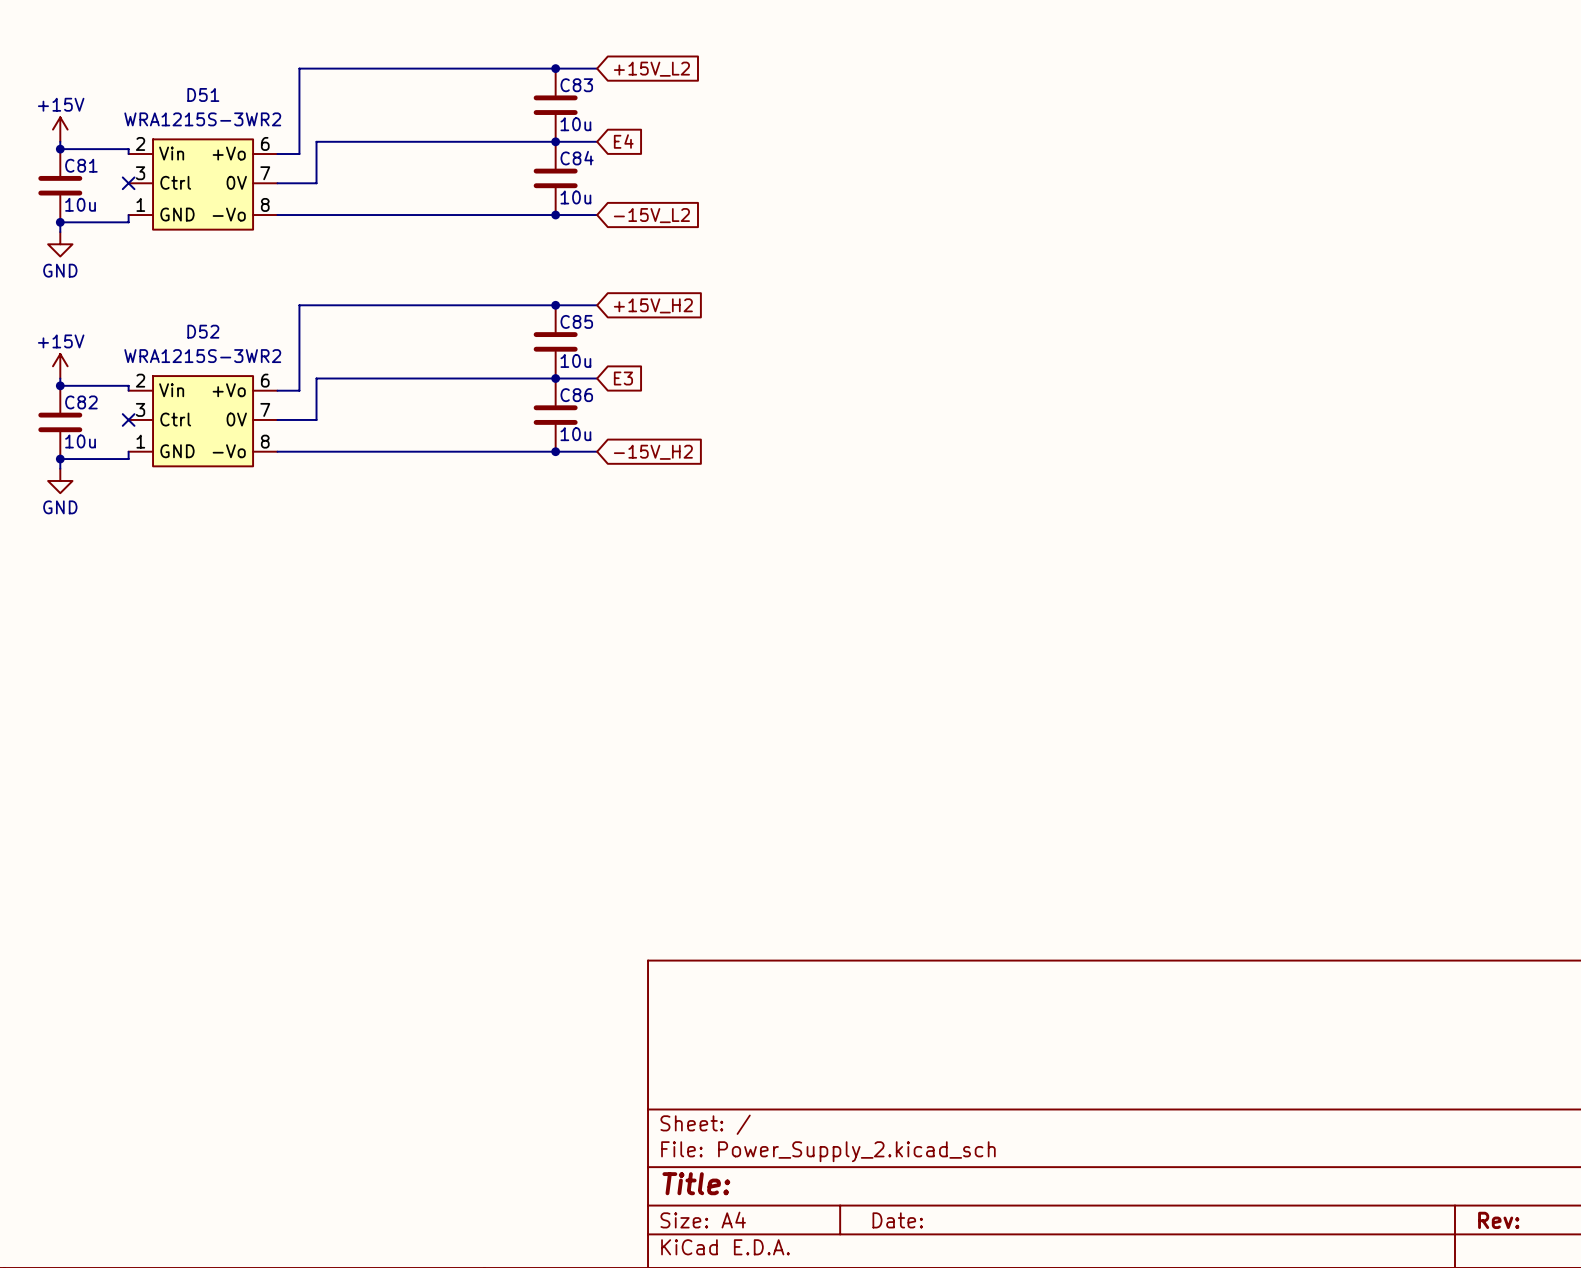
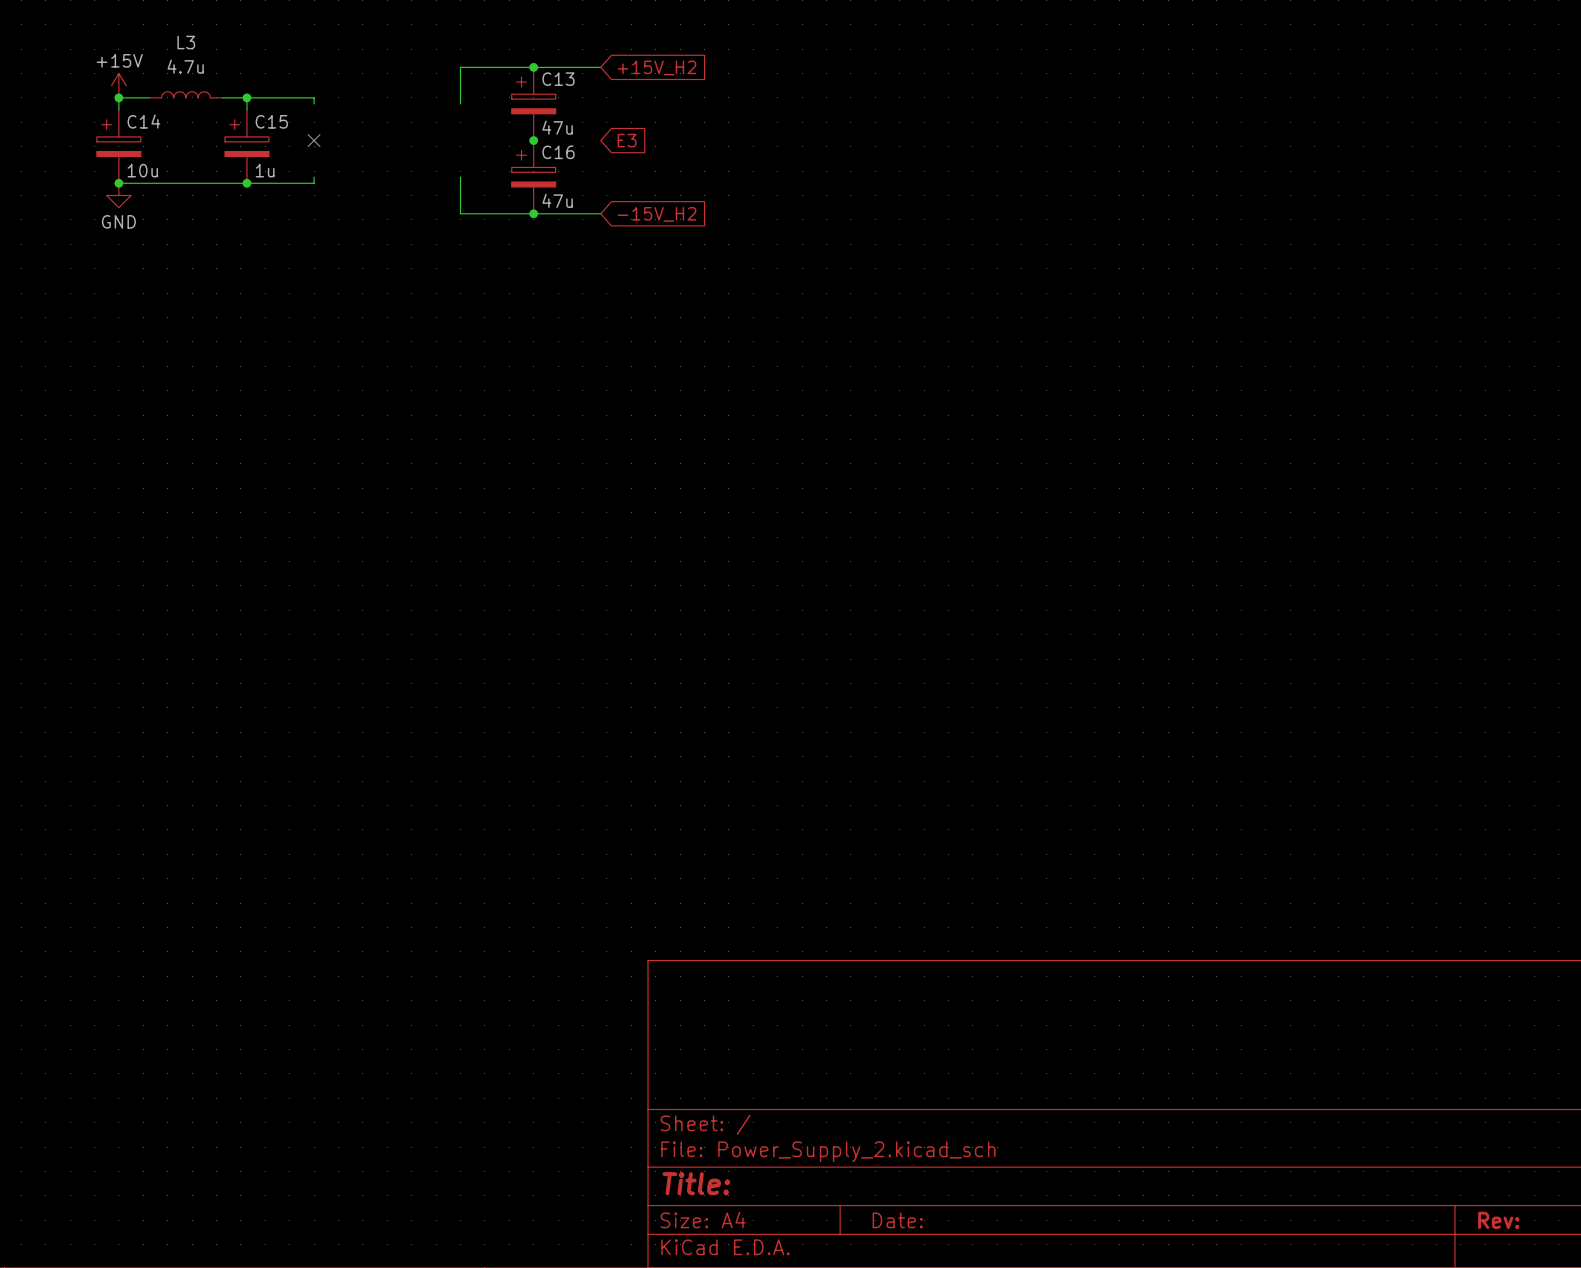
wire: none -> (600, 67) (460, 67) (460, 103)
junction position: (555, 68) -> (533, 67)
wire: (597, 68) (299, 68) (299, 154) (277, 154) -> none
global label: +15V_L2 (651, 69) -> none
L3: none -> 4.7u (185, 94)
junction: none -> (118, 97)
wire: none -> (149, 97) (118, 97) (118, 110)
wire: none -> (222, 97) (314, 97) (314, 103)
wire: none -> (246, 97) (246, 110)
junction: none -> (246, 97)
C13: none -> 47u (533, 103)
C83: 10u (555, 105) -> none
power symbol position: +15V (60, 129) -> +15V (118, 85)
no-connect mark: none -> (314, 140)
wire: (60, 141) (60, 149) (128, 149) (128, 154) -> none
junction position: (555, 141) -> (533, 140)
wire: (597, 141) (316, 141) (316, 183) (314, 183) -> (314, 177) (314, 183)
global label: E4 (623, 141) -> none
C14: none -> 10u (118, 146)
C15: none -> 1u (246, 146)
junction: (60, 149) -> none
wire: none -> (460, 177) (460, 213) (600, 213)
C16: none -> 47u (533, 177)
C84: 10u (555, 178) -> none
junction: none -> (118, 183)
no-connect mark: (128, 183) -> none
junction: none -> (246, 183)
D51: WRA1215S-3WR2 (203, 184) -> none
C81: 10u (60, 185) -> none
wire: (128, 215) (128, 222) (60, 222) (60, 232) -> none
wire: (277, 215) (597, 215) -> none
junction position: (555, 215) -> (533, 213)
global label: -15V_L2 (651, 215) -> none
junction: (60, 222) -> none
power symbol position: GND (60, 244) -> GND (118, 195)
junction: (555, 305) -> none
wire: (597, 305) (299, 305) (299, 390) (277, 390) -> none
global label position: +15V_H2 (653, 305) -> +15V_H2 (657, 67)
C85: 10u (555, 341) -> none
power symbol: +15V (60, 366) -> none
wire: (60, 378) (60, 385) (128, 385) (128, 390) -> none
junction: (555, 378) -> none
wire: (597, 378) (316, 378) (316, 419) (277, 419) -> none
global label position: E3 (623, 378) -> E3 (627, 140)
junction: (60, 385) -> none
C86: 10u (555, 415) -> none
no-connect mark: (128, 419) -> none
D52: WRA1215S-3WR2 (203, 421) -> none
C82: 10u (60, 422) -> none
wire: (128, 451) (128, 459) (60, 459) (60, 468) -> none
wire: (277, 451) (597, 451) -> none
junction: (555, 451) -> none
global label position: -15V_H2 (653, 452) -> -15V_H2 (657, 214)
junction: (60, 459) -> none
power symbol: GND (60, 480) -> none

